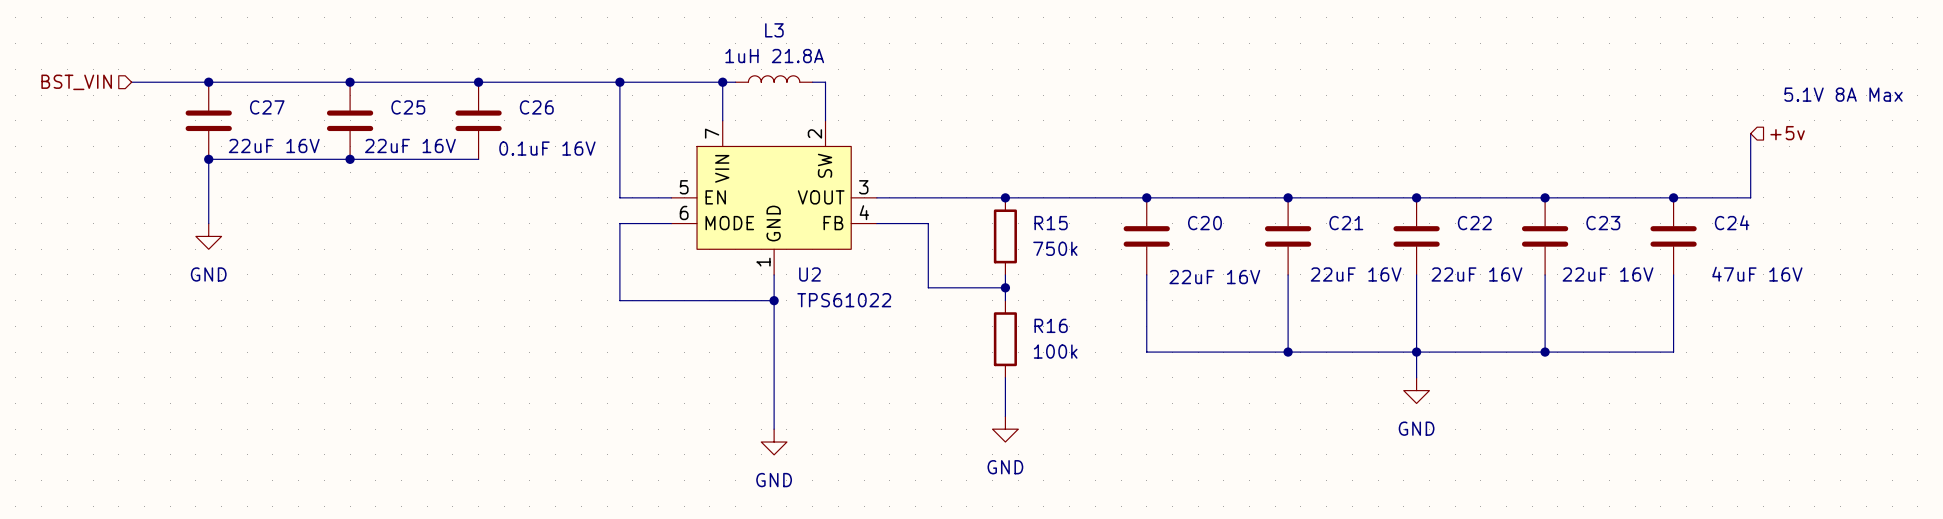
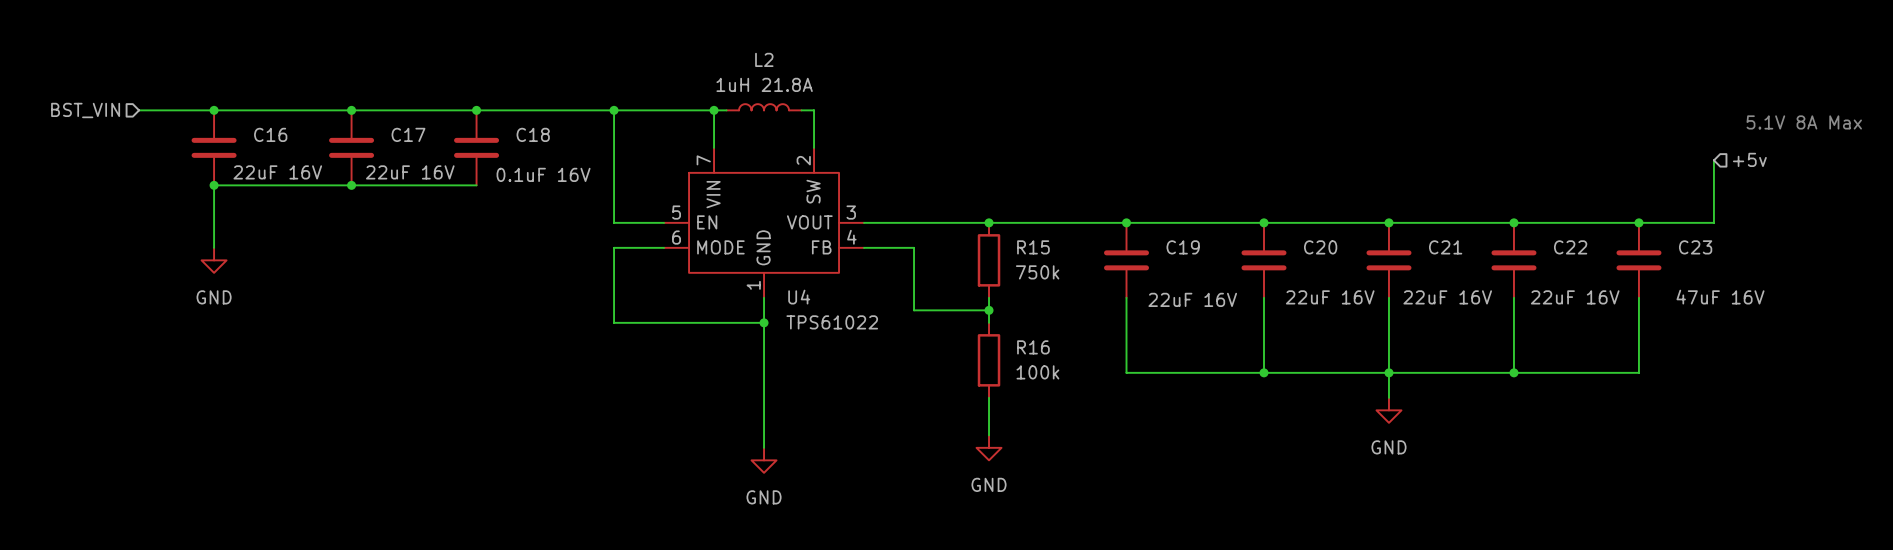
L3 name: L3 (774, 30) -> L2 (764, 59)
C27 name: C27 (267, 107) -> C16 (270, 134)
C25 name: C25 (408, 107) -> C17 (408, 134)
C26 name: C26 (536, 107) -> C18 (533, 134)
C24 name: C24 (1732, 222) -> C23 (1695, 247)
C20 name: C20 (1204, 223) -> C19 (1183, 247)
C21 name: C21 (1346, 223) -> C20 (1320, 247)
C22 name: C22 (1474, 223) -> C21 (1445, 247)
C23 name: C23 (1603, 223) -> C22 (1570, 247)
U2 name: U2 (809, 274) -> U4 (799, 297)

